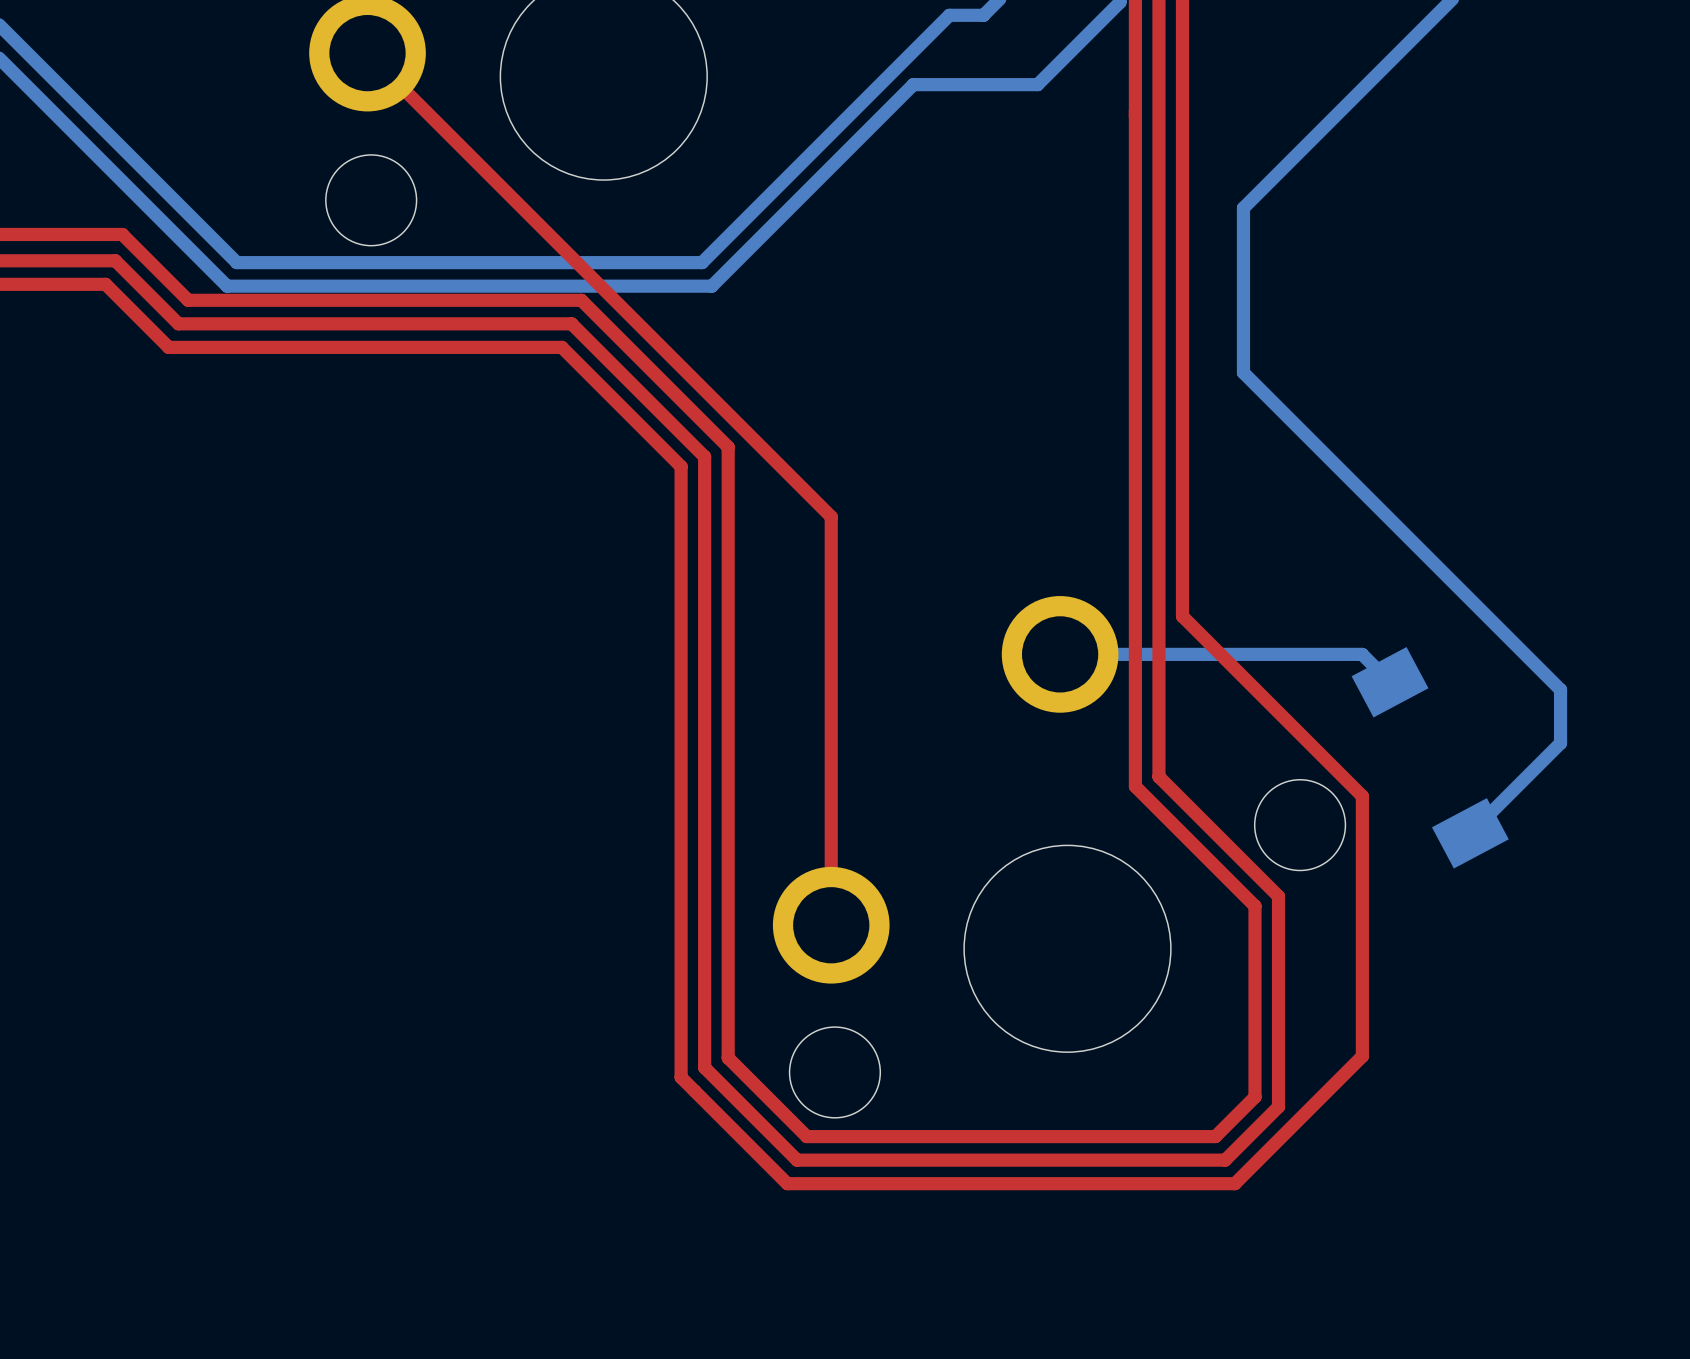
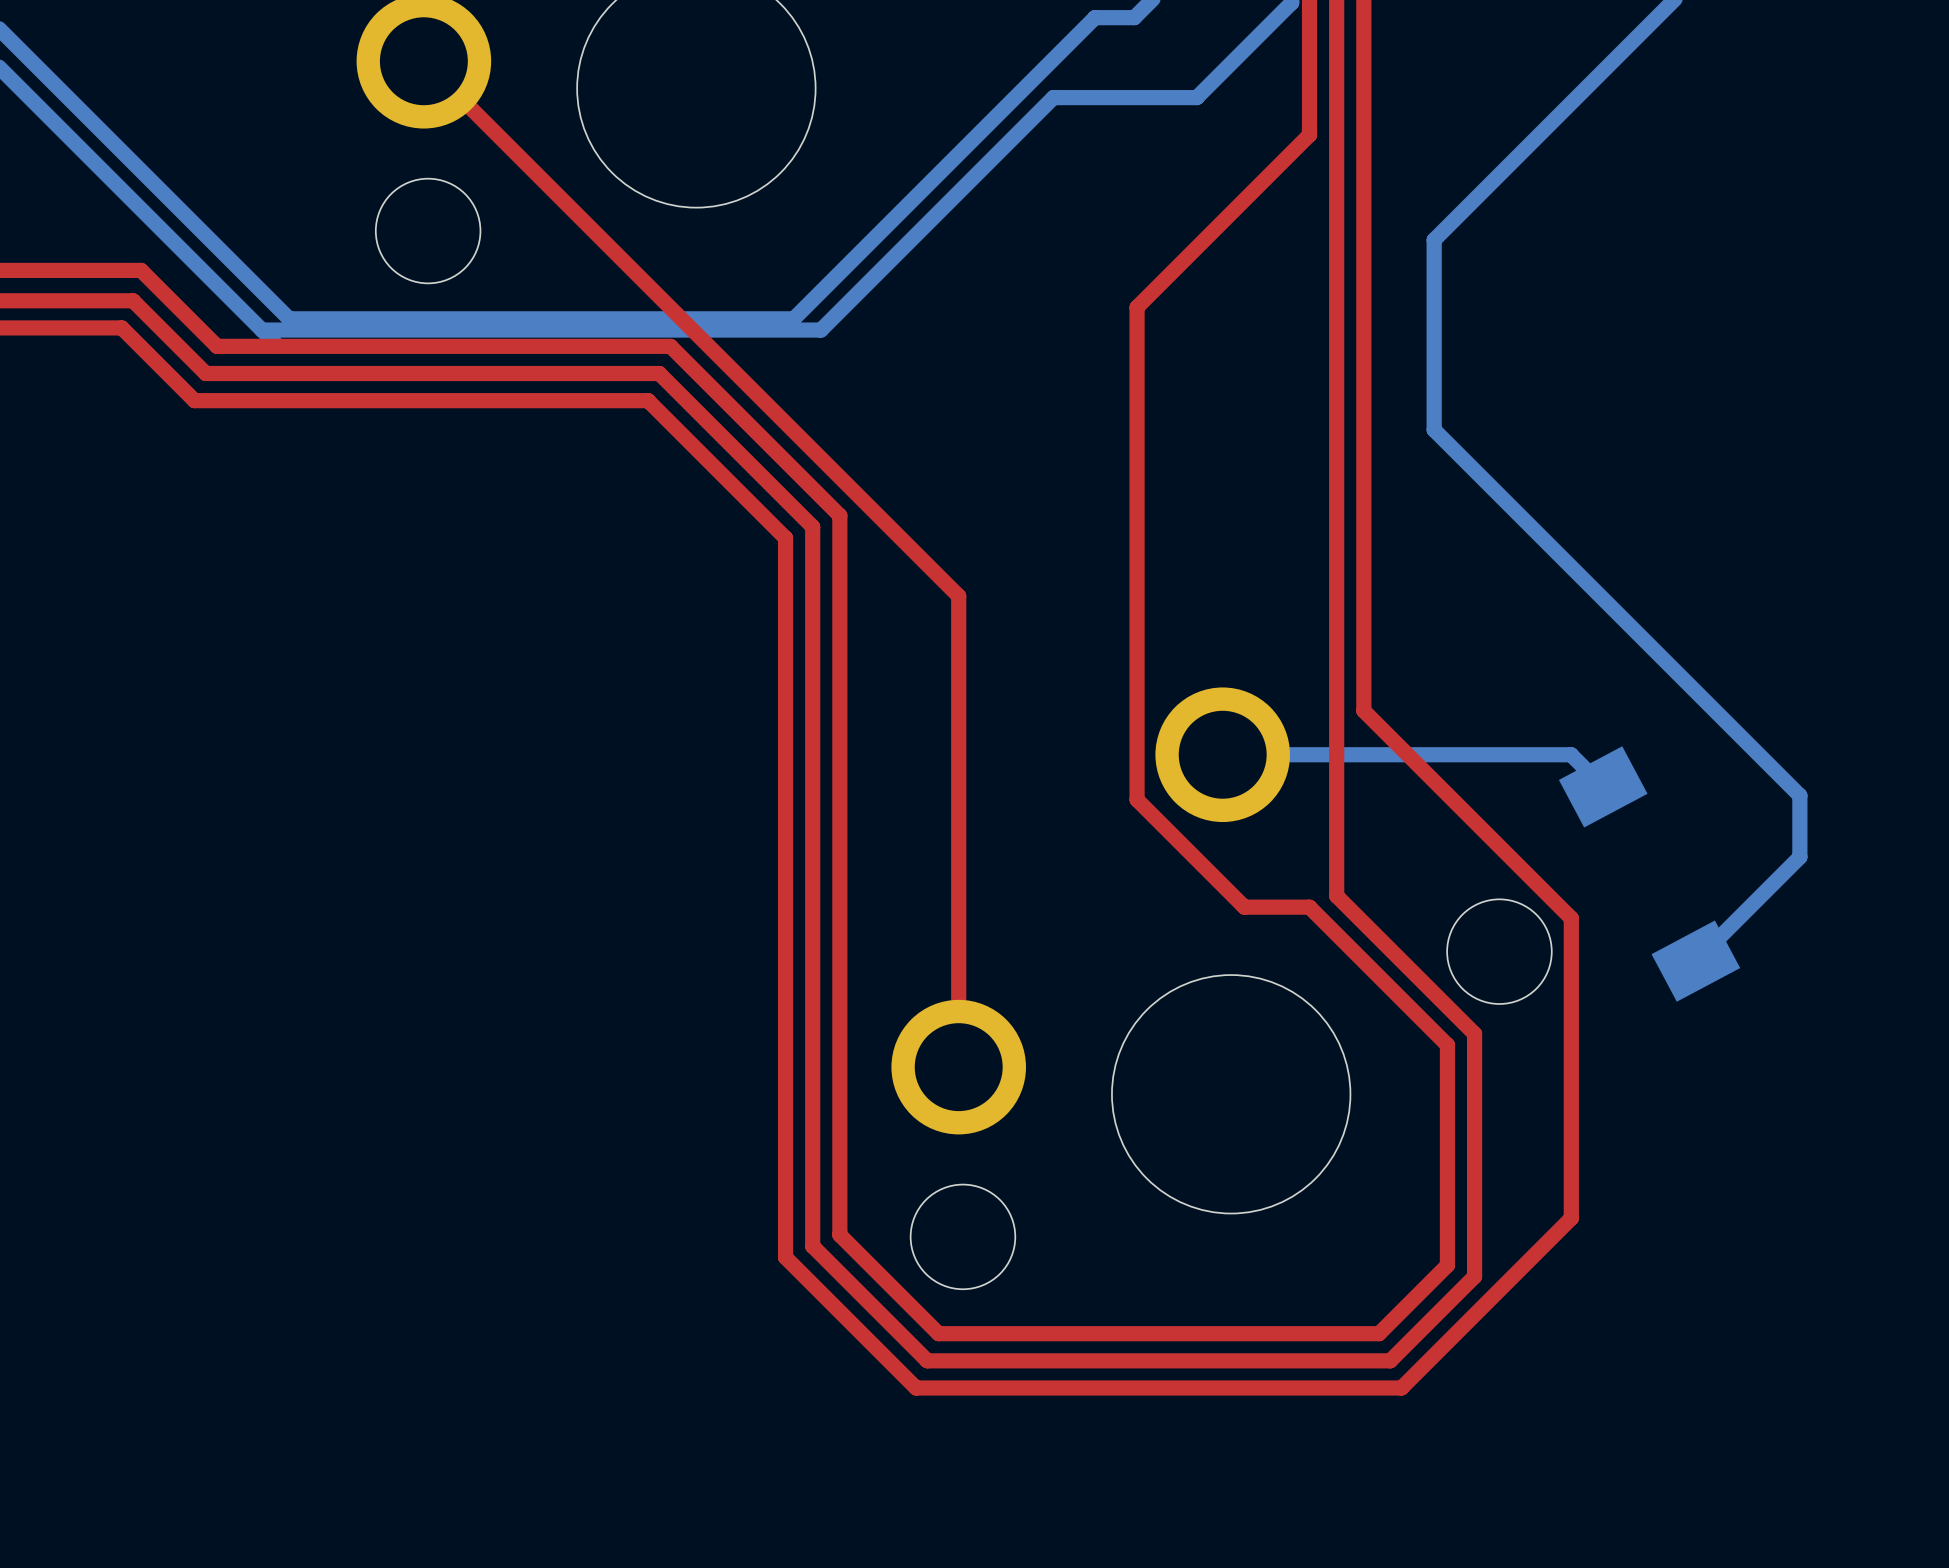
top track: (1135, 116) (1135, 786) -> (1309, 134) (1137, 307) (1137, 799) (1244, 907) (1309, 907)
bottom track: (236, 262) (702, 262) -> (273, 302) (289, 318) (793, 318) (809, 302)
top track: (728, 1057) (806, 1136) (1215, 1136) -> (839, 1220) (839, 1234) (938, 1333) (1379, 1333) (1401, 1310)
top track: (704, 1067) (797, 1160) (1225, 1160) -> (812, 1231) (812, 1246) (927, 1360) (1390, 1360) (1413, 1338)
top track: (681, 1077) (787, 1183) (1234, 1183) -> (785, 1242) (785, 1257) (916, 1387) (1401, 1387) (1424, 1365)

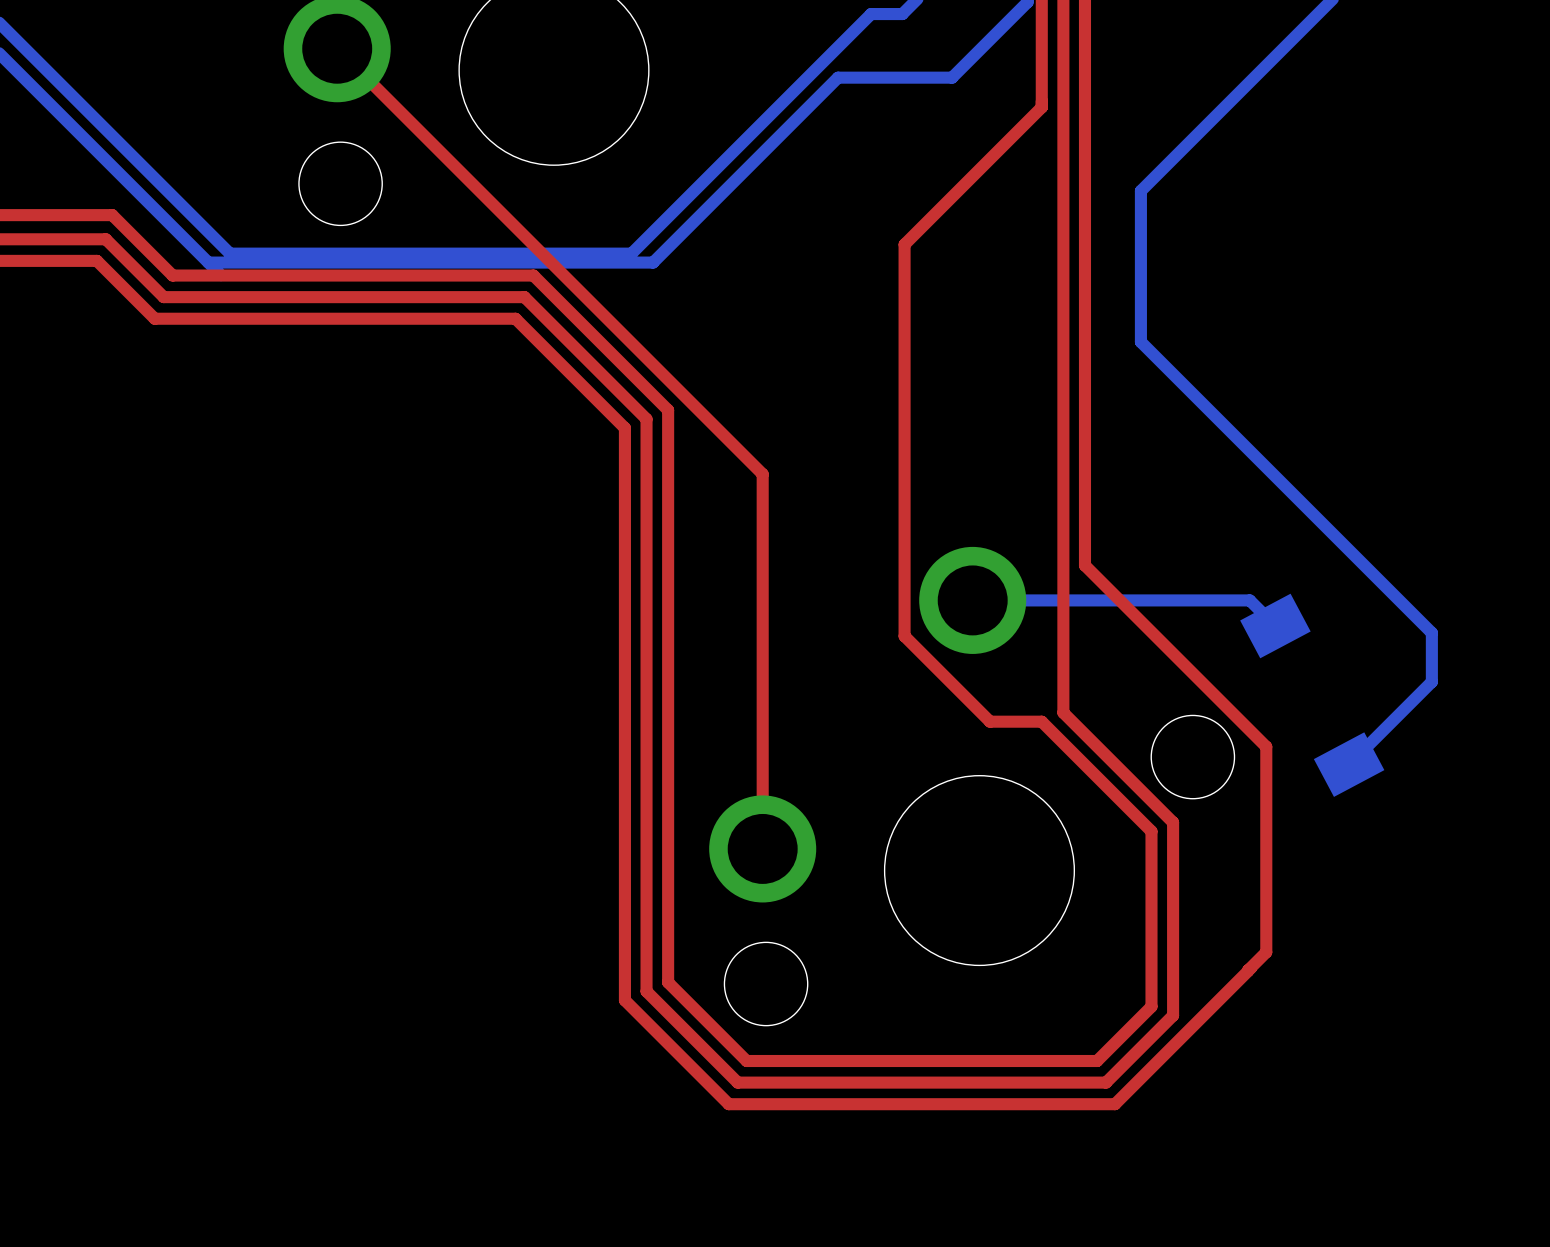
top track: (1571, 918) (1571, 1218) (1568, 1220) -> (1250, 730) (1266, 746) (1266, 952) (1248, 970) (1250, 968)

